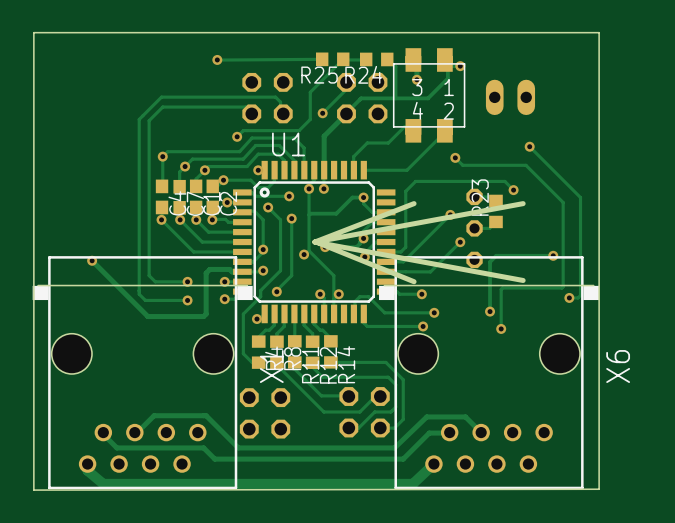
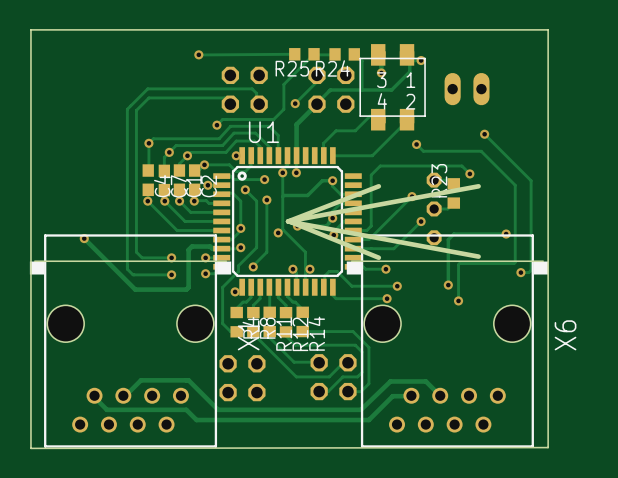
track: (433, 464) (412, 483) (103, 483) (87, 470) (87, 464) -> none

